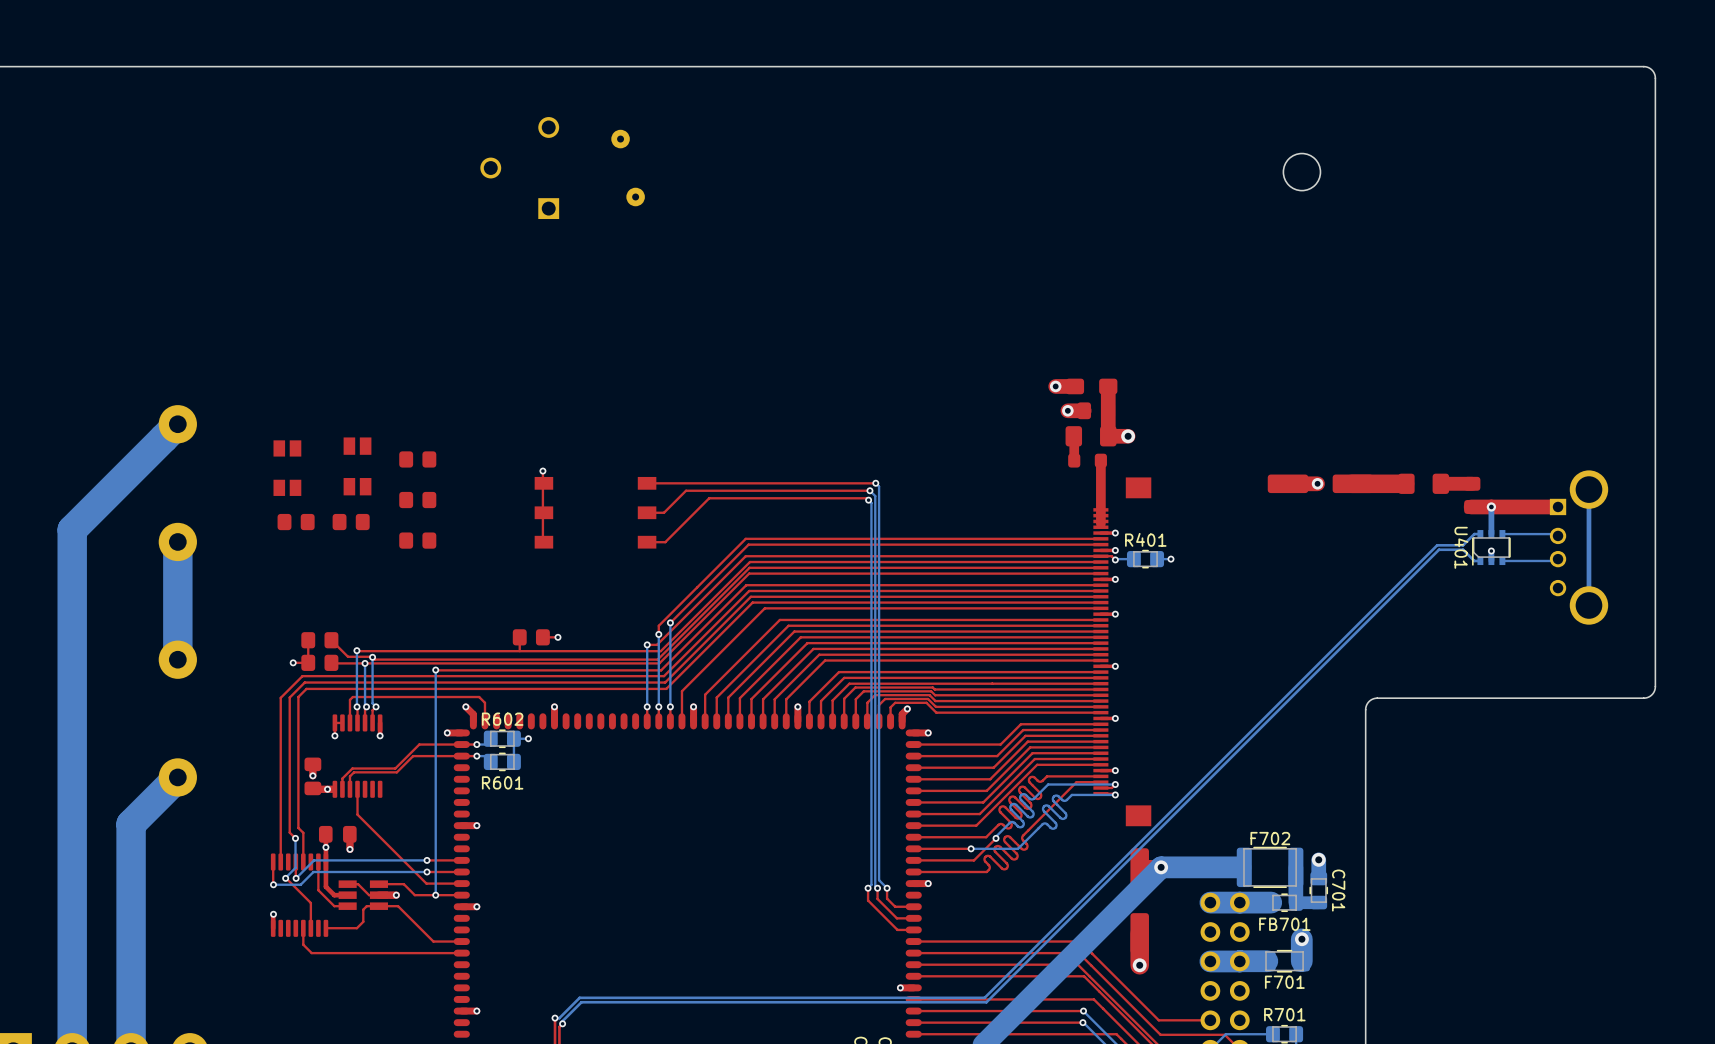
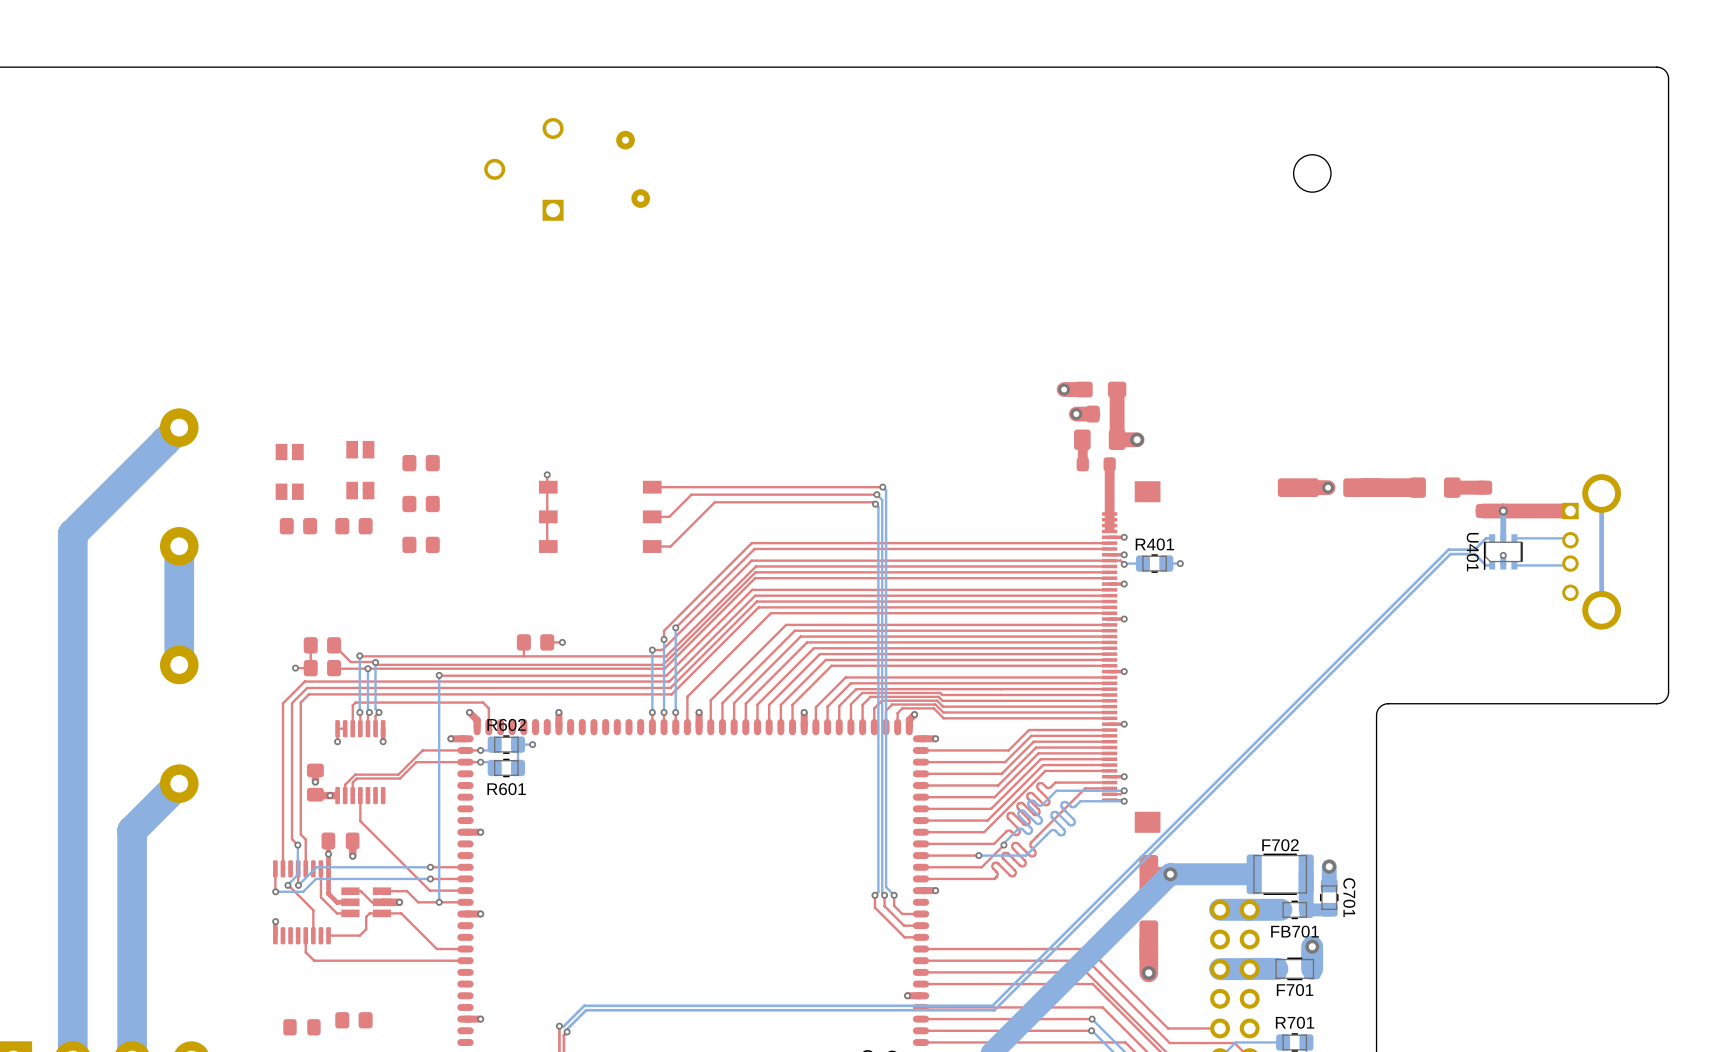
part: none -> (353, 1020)
part: none -> (301, 1027)

